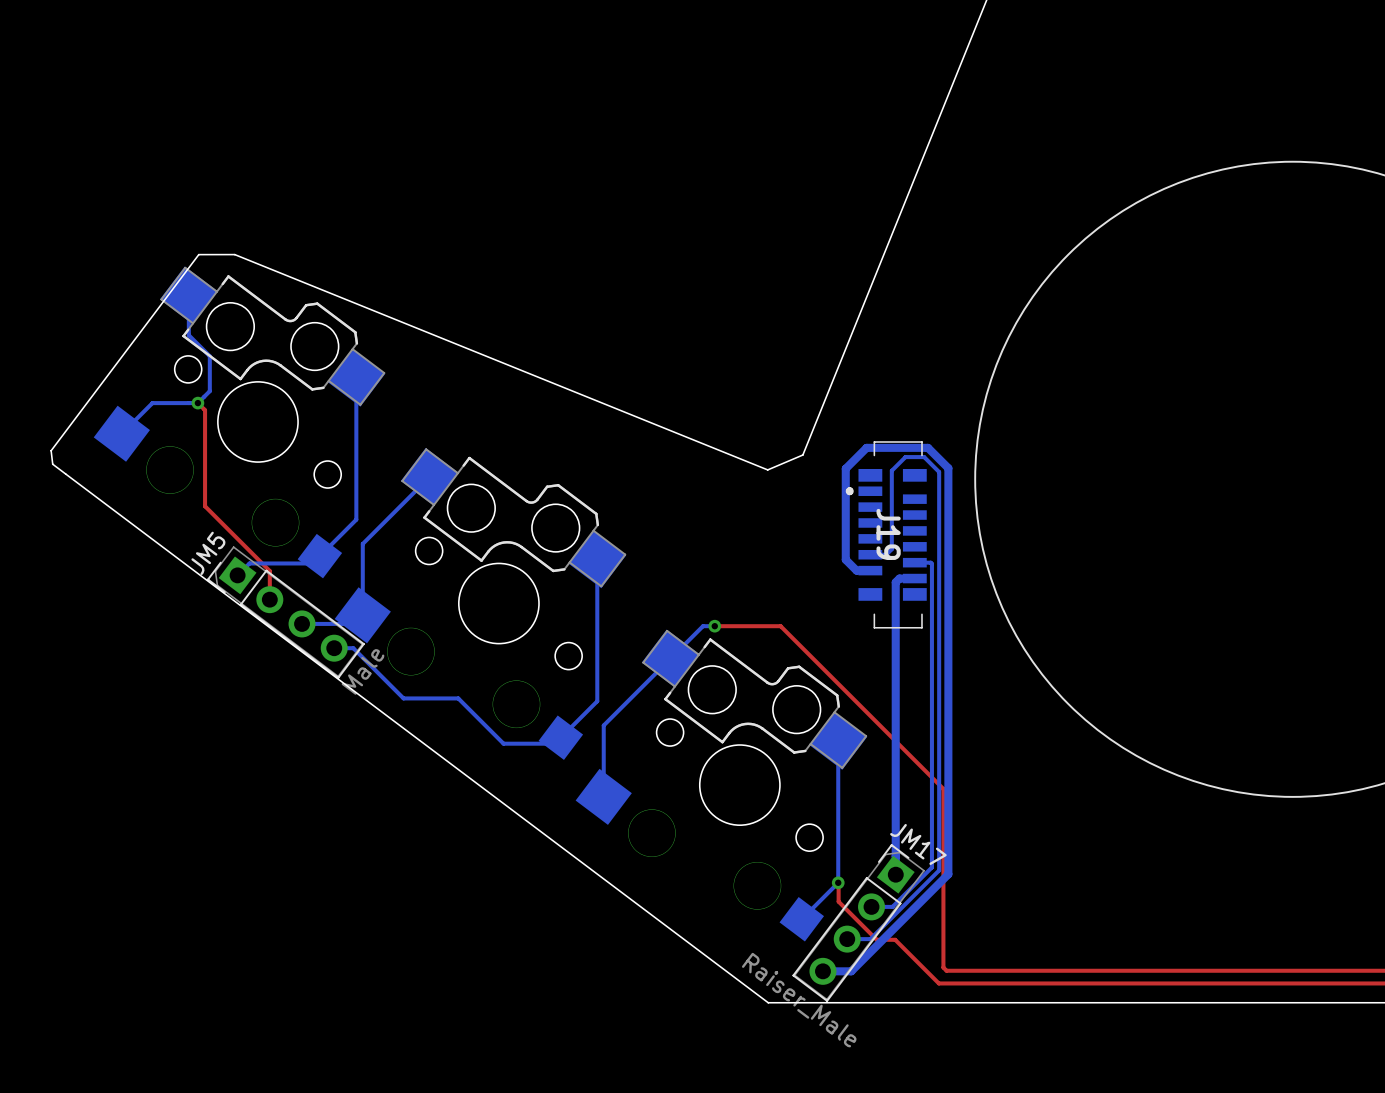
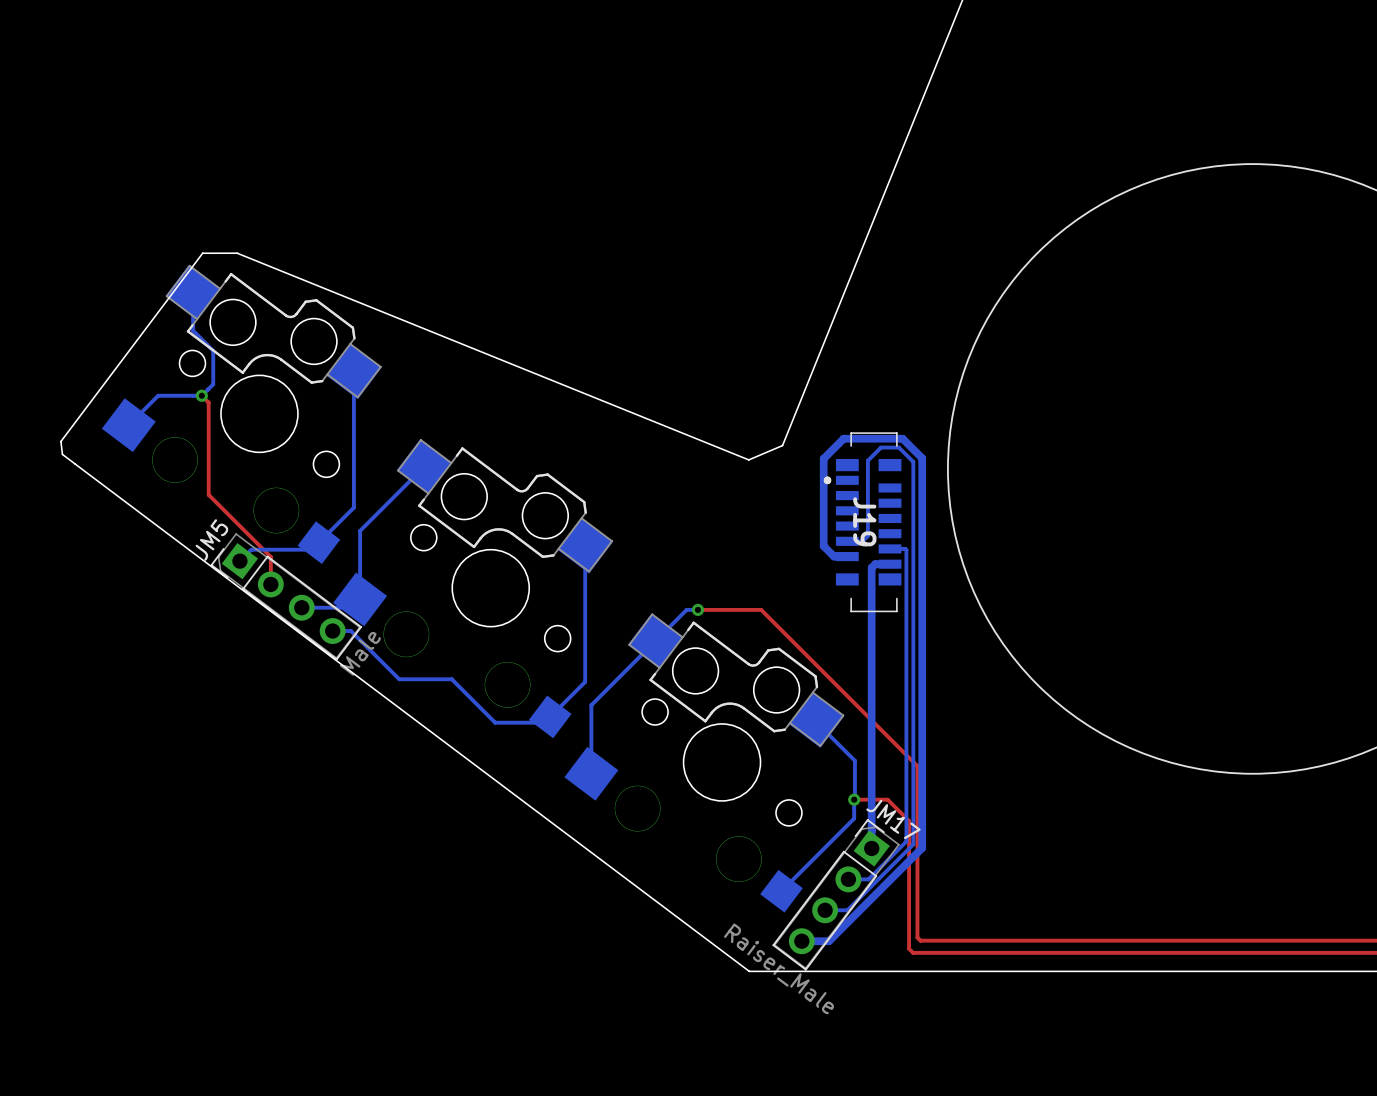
bottom track: (838, 743) (838, 882) -> (816, 722) (854, 760) (854, 818) (816, 856)
top track: (838, 882) (838, 901) (876, 939) (895, 939) (934, 979) -> (854, 799) (887, 799) (909, 821) (909, 948)
via position: (838, 882) -> (854, 799)

